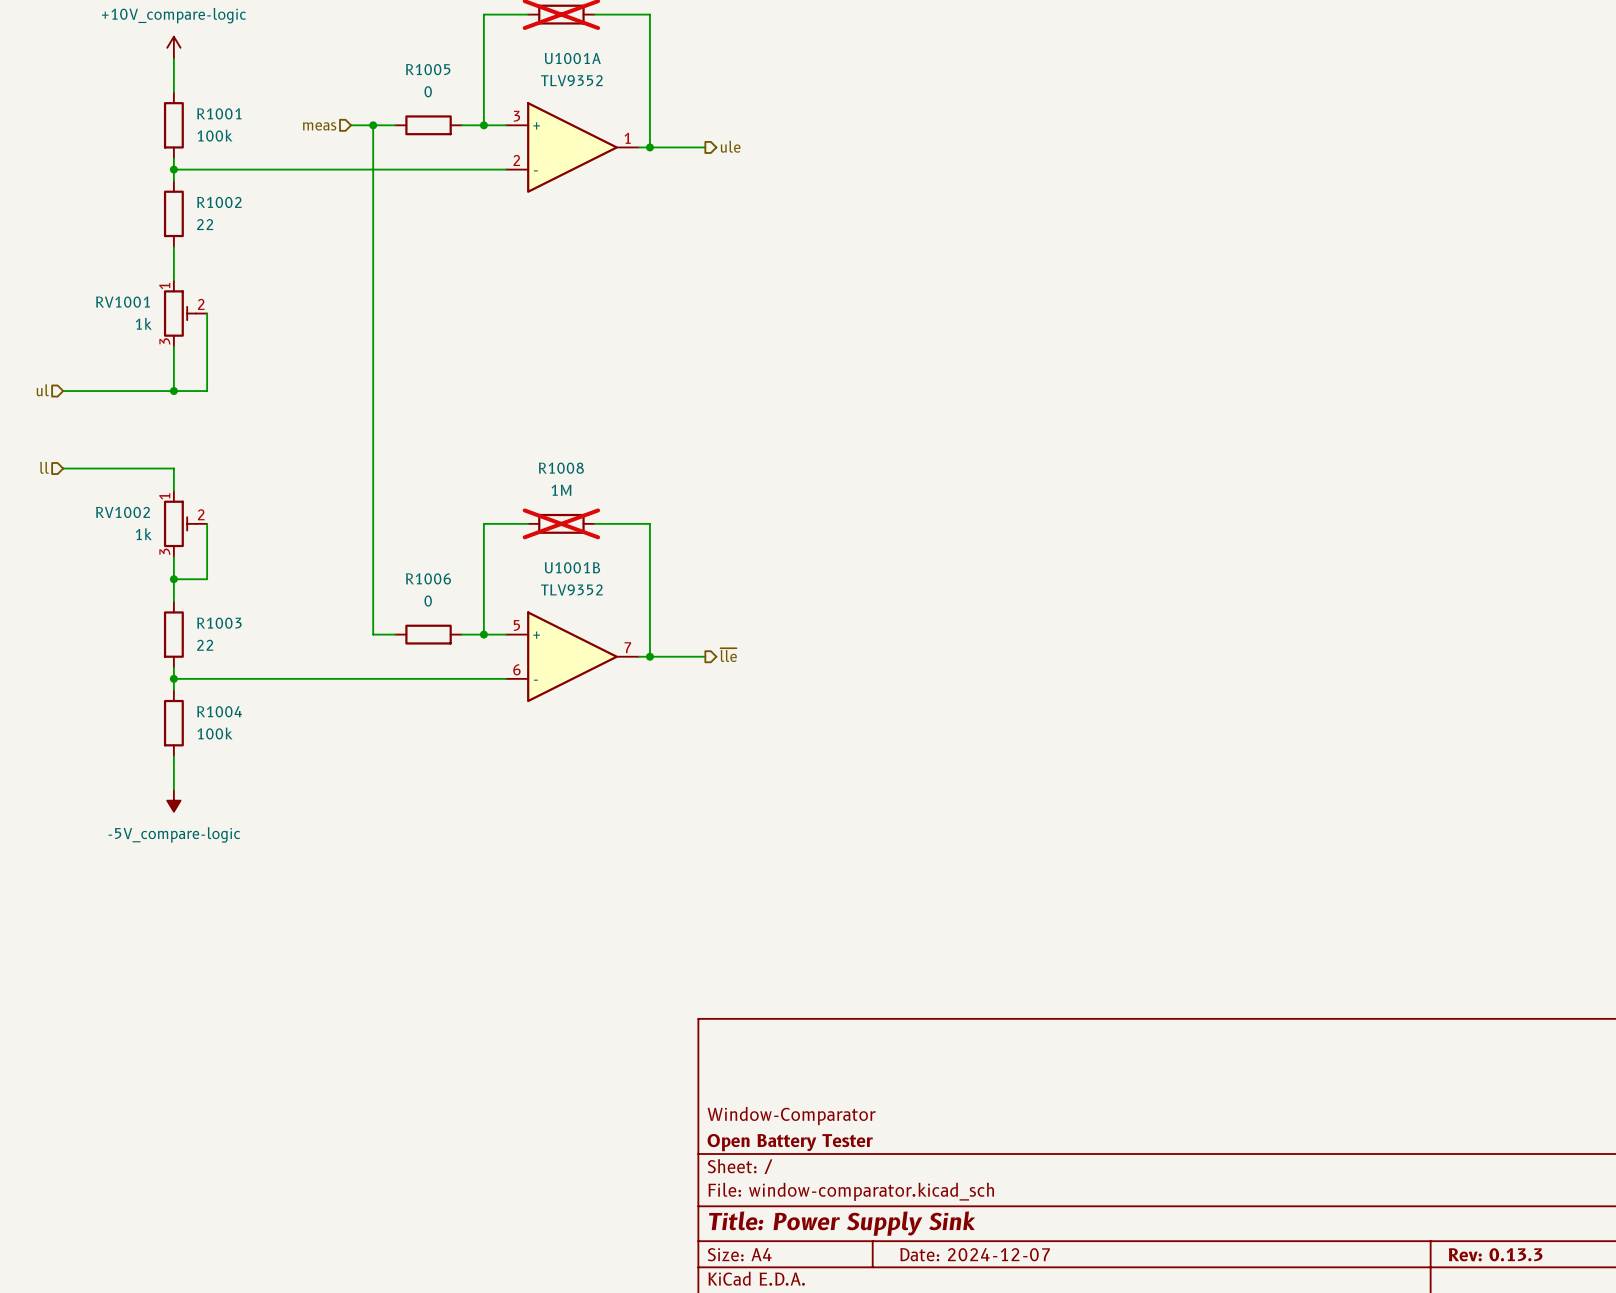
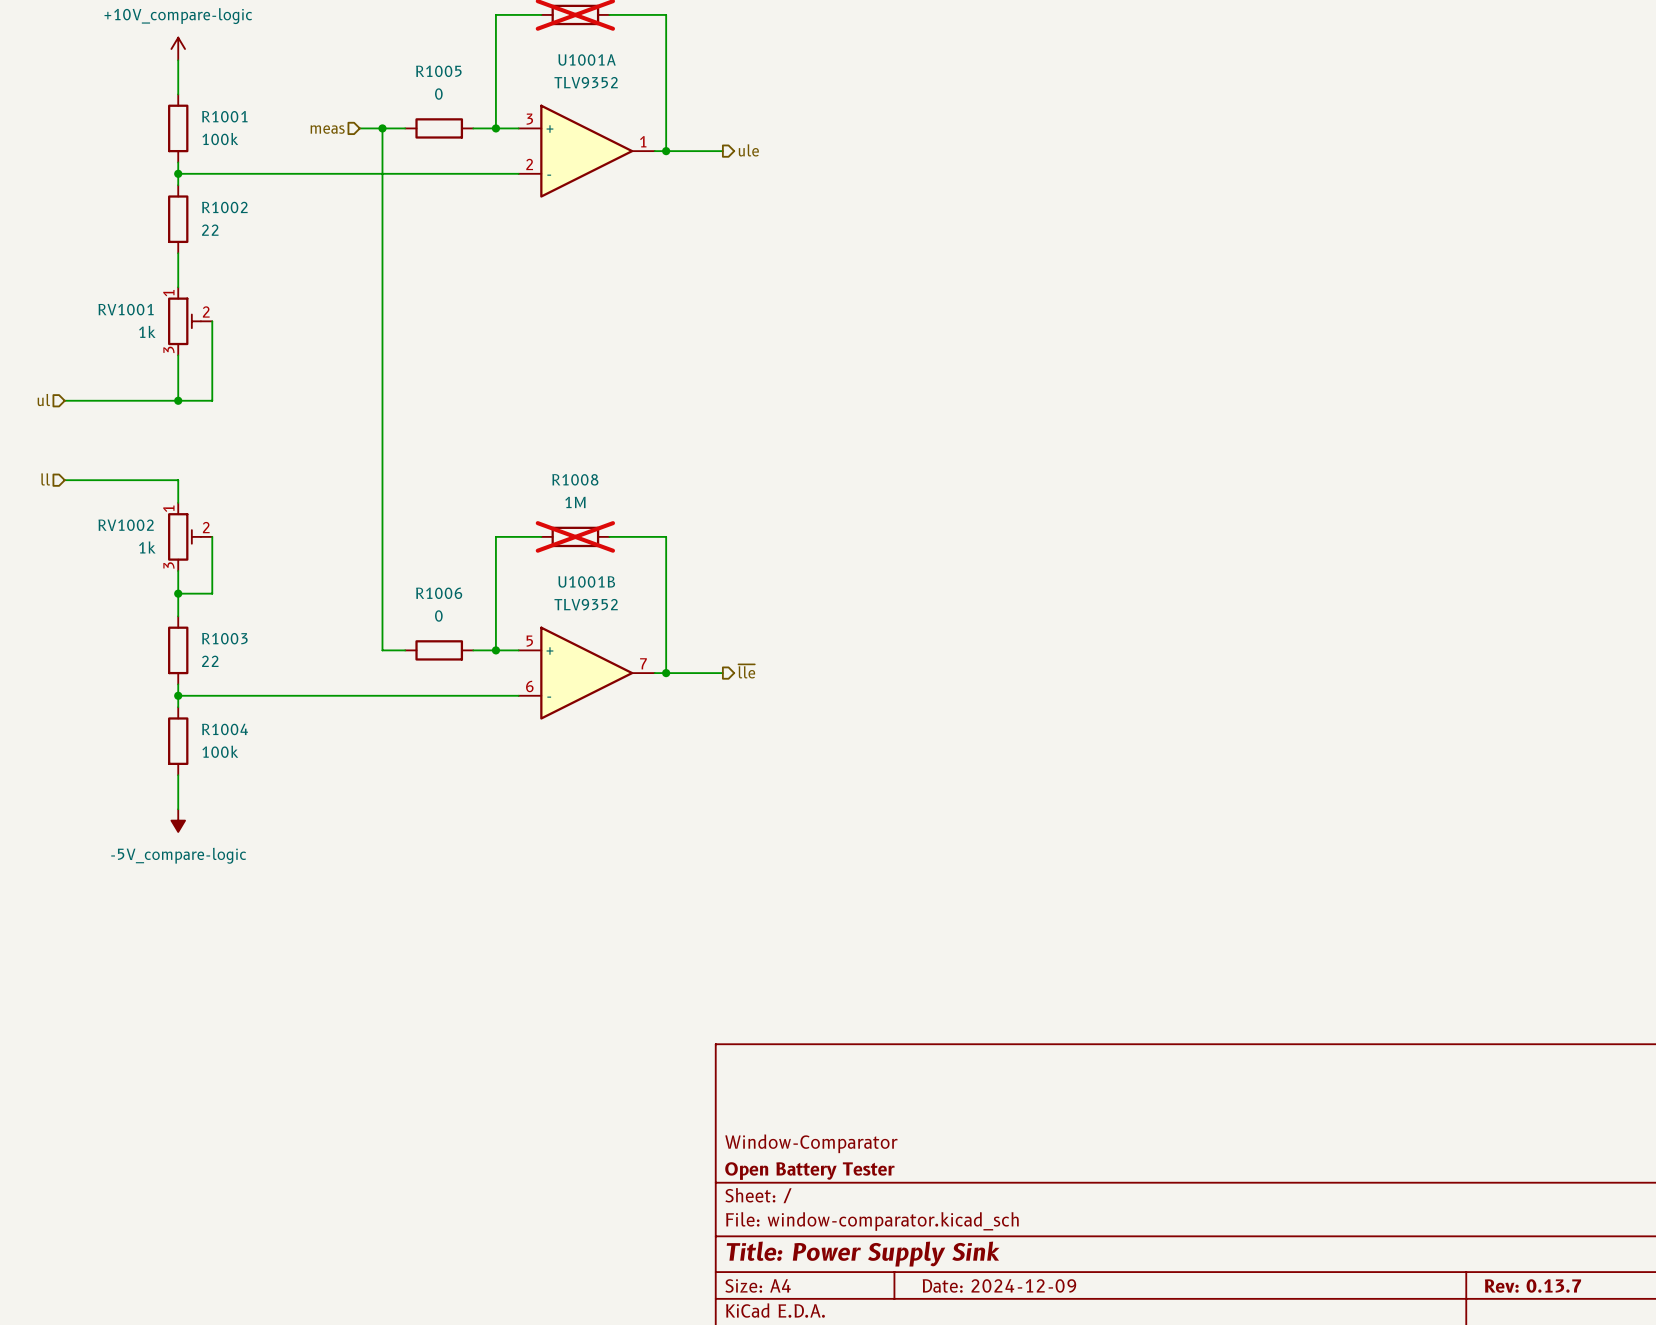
title block: Date: 2024-12-07 (975, 1254) -> Date: 2024-12-09 (999, 1285)
title block: Rev: 0.13.3 (1495, 1254) -> Rev: 0.13.7 (1532, 1285)

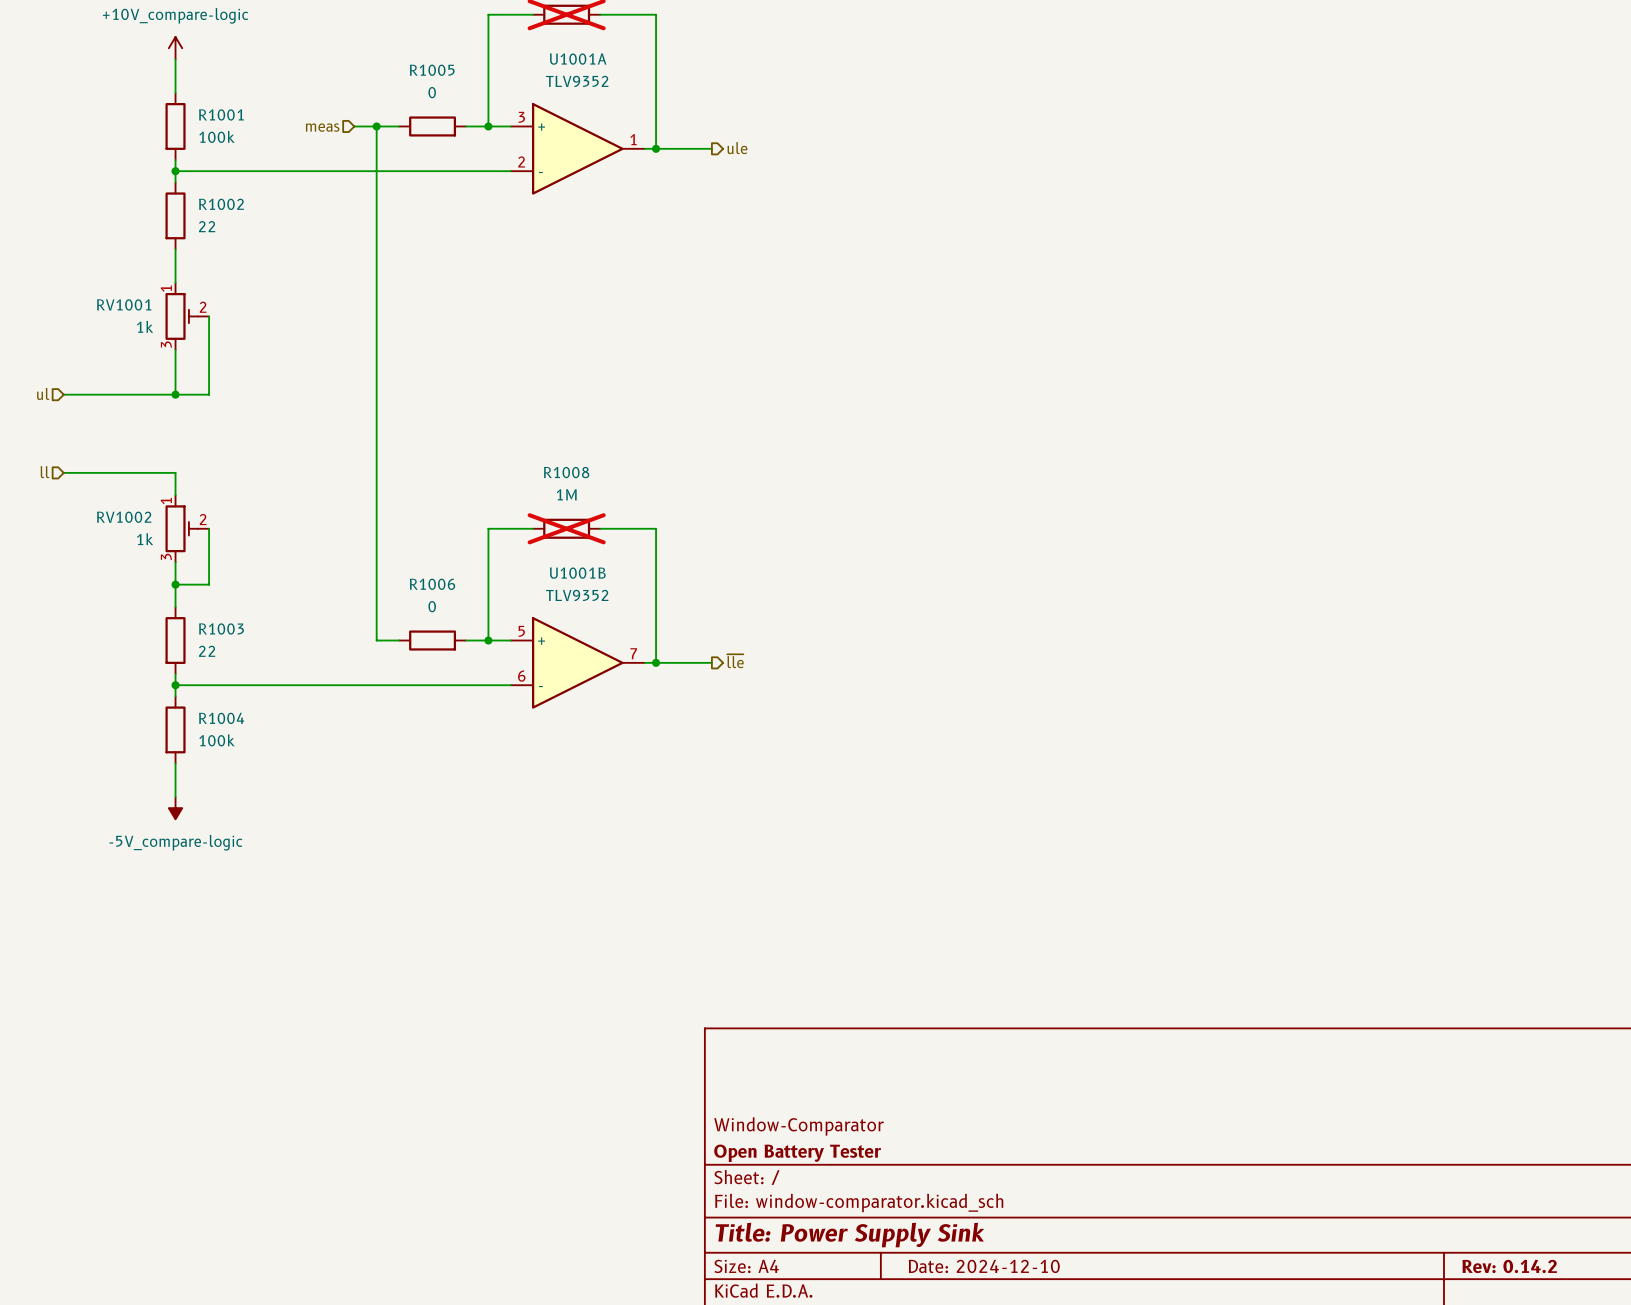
title block: Date: 2024-12-09 (999, 1285) -> Date: 2024-12-10 (984, 1266)
title block: Rev: 0.13.7 (1532, 1285) -> Rev: 0.14.2 (1509, 1266)

